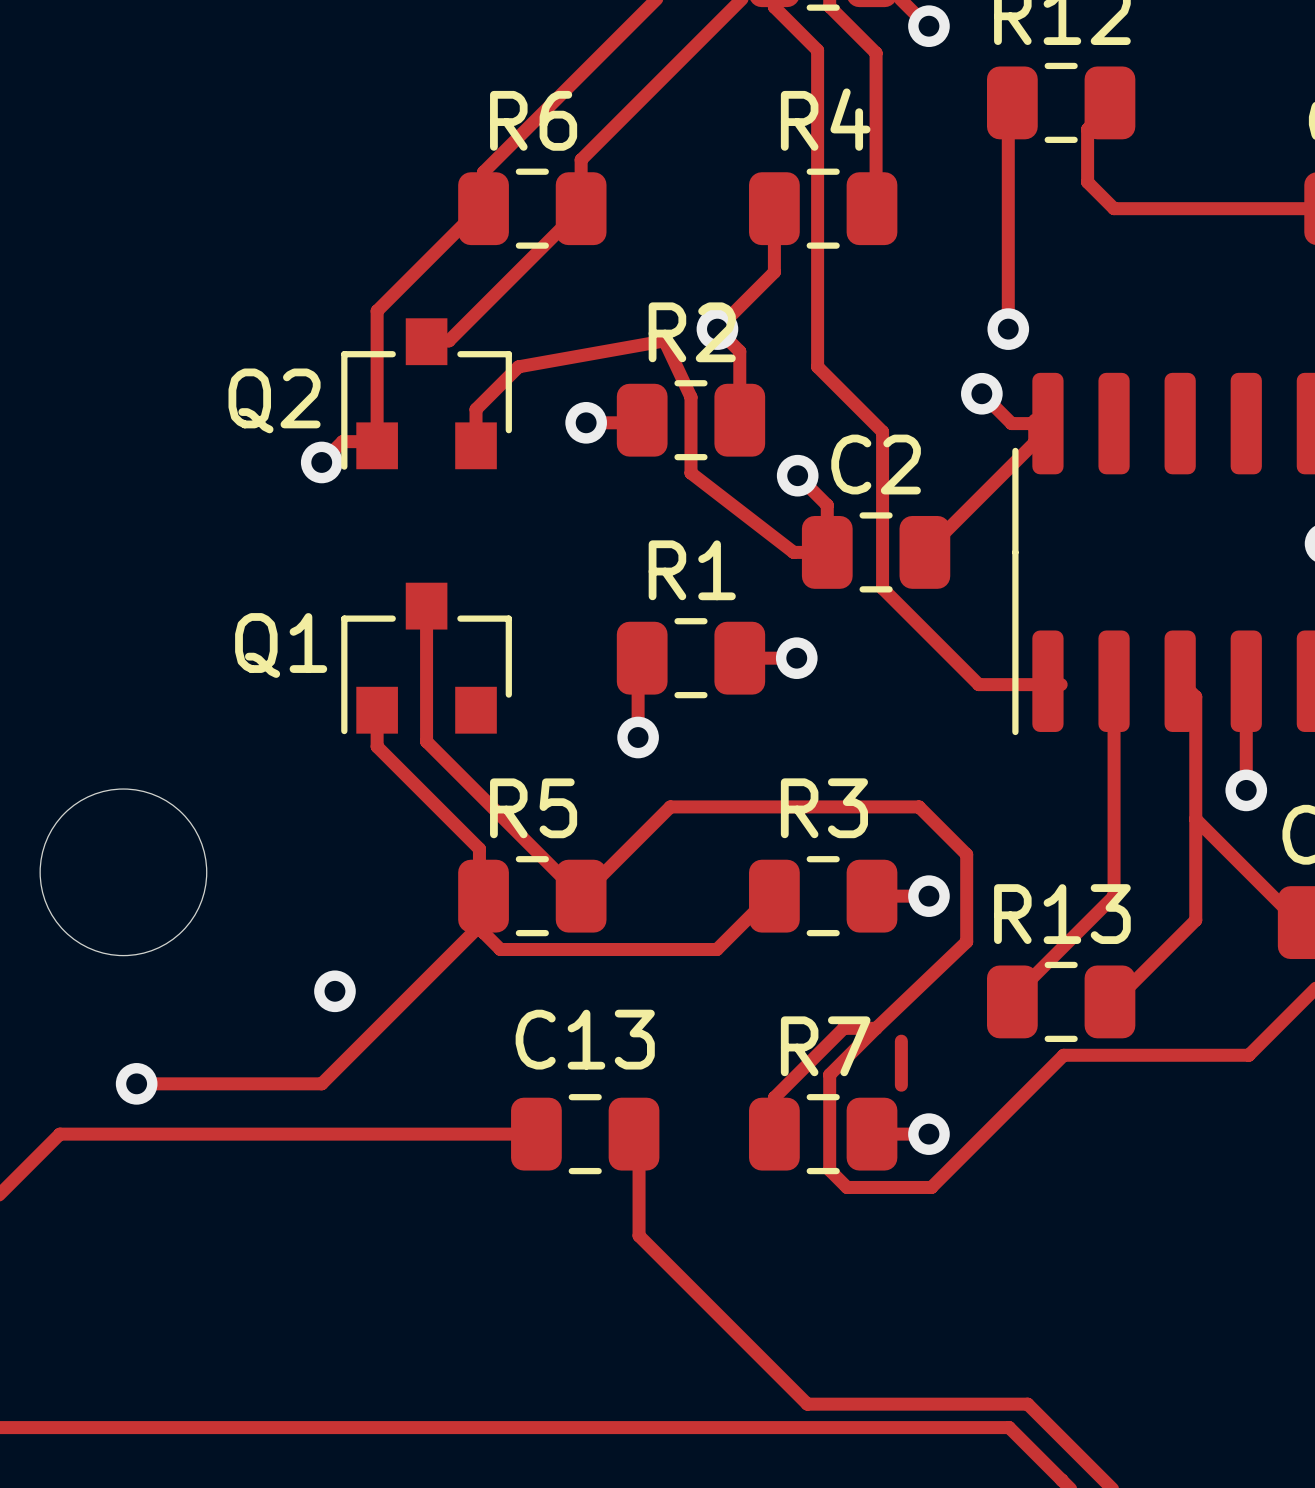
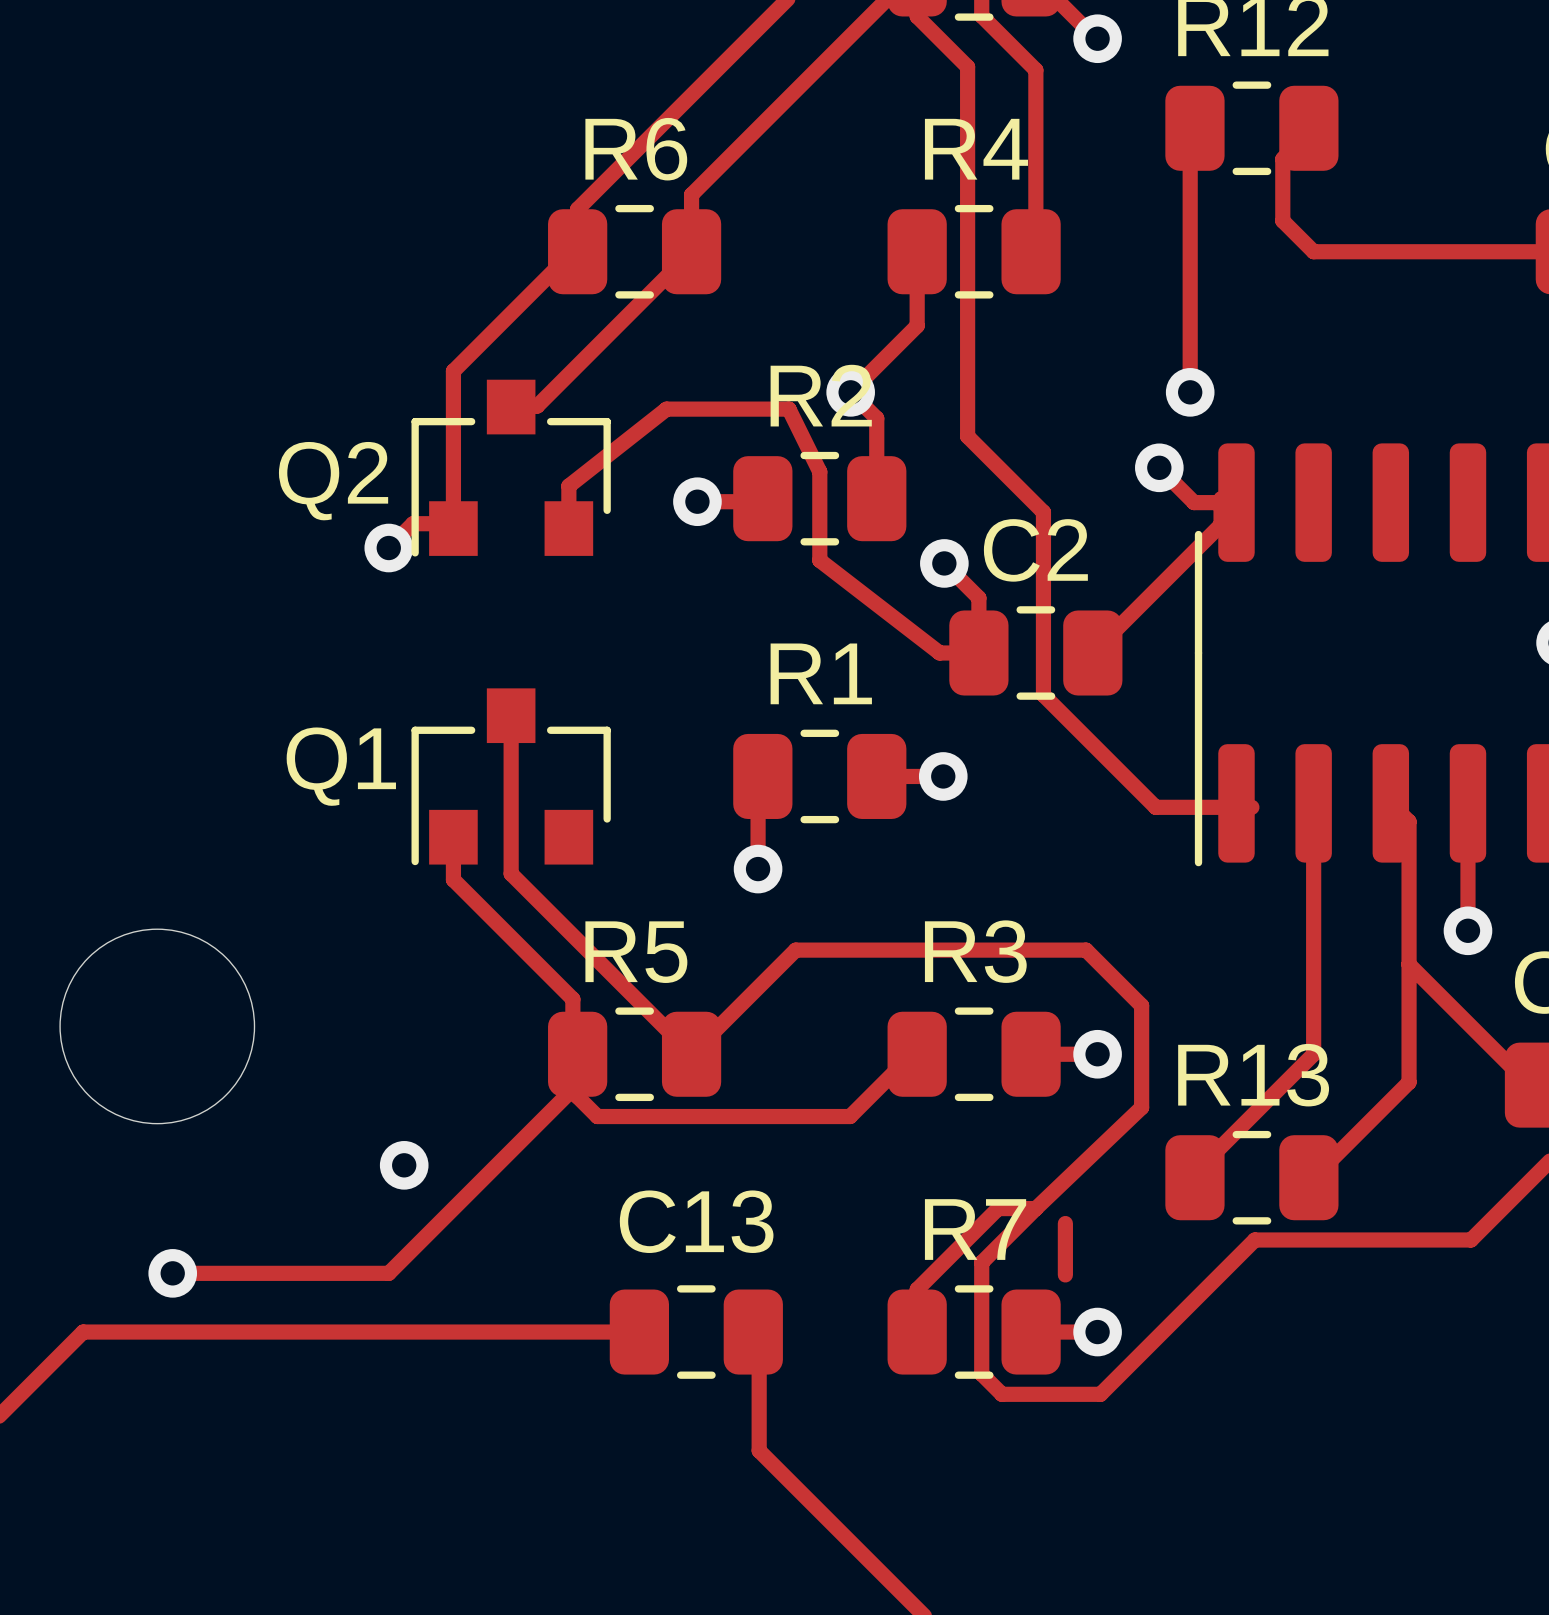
track: (690, 397) (664, 340) (518, 366) (476, 409) -> (819, 471) (788, 409) (666, 409) (568, 486)

